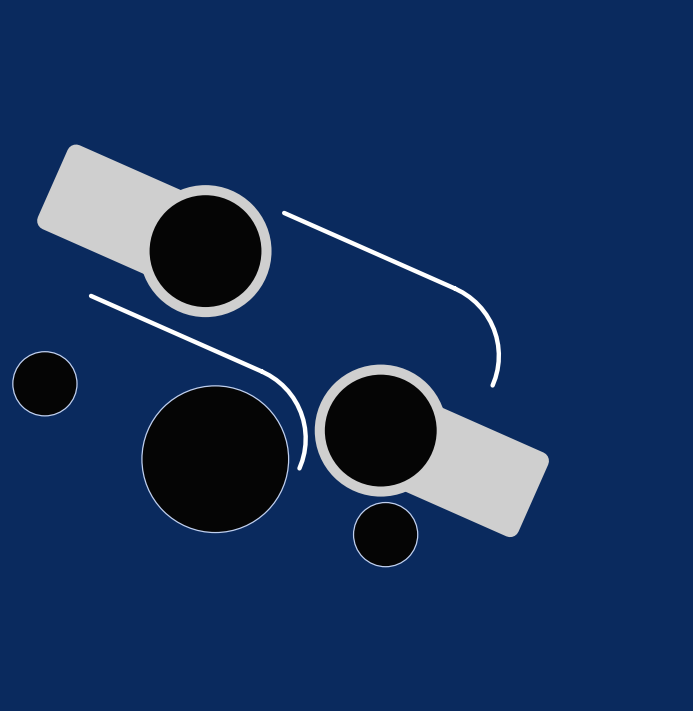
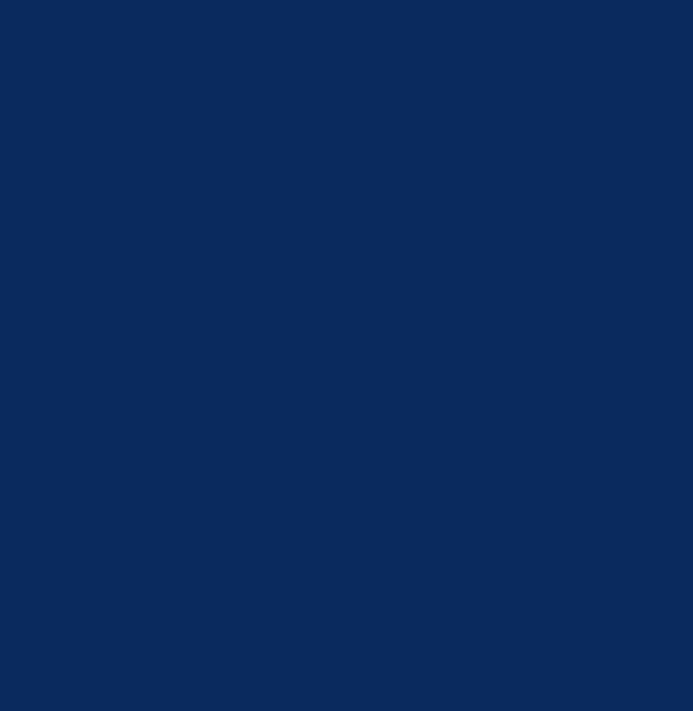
part: (280, 355) -> none

